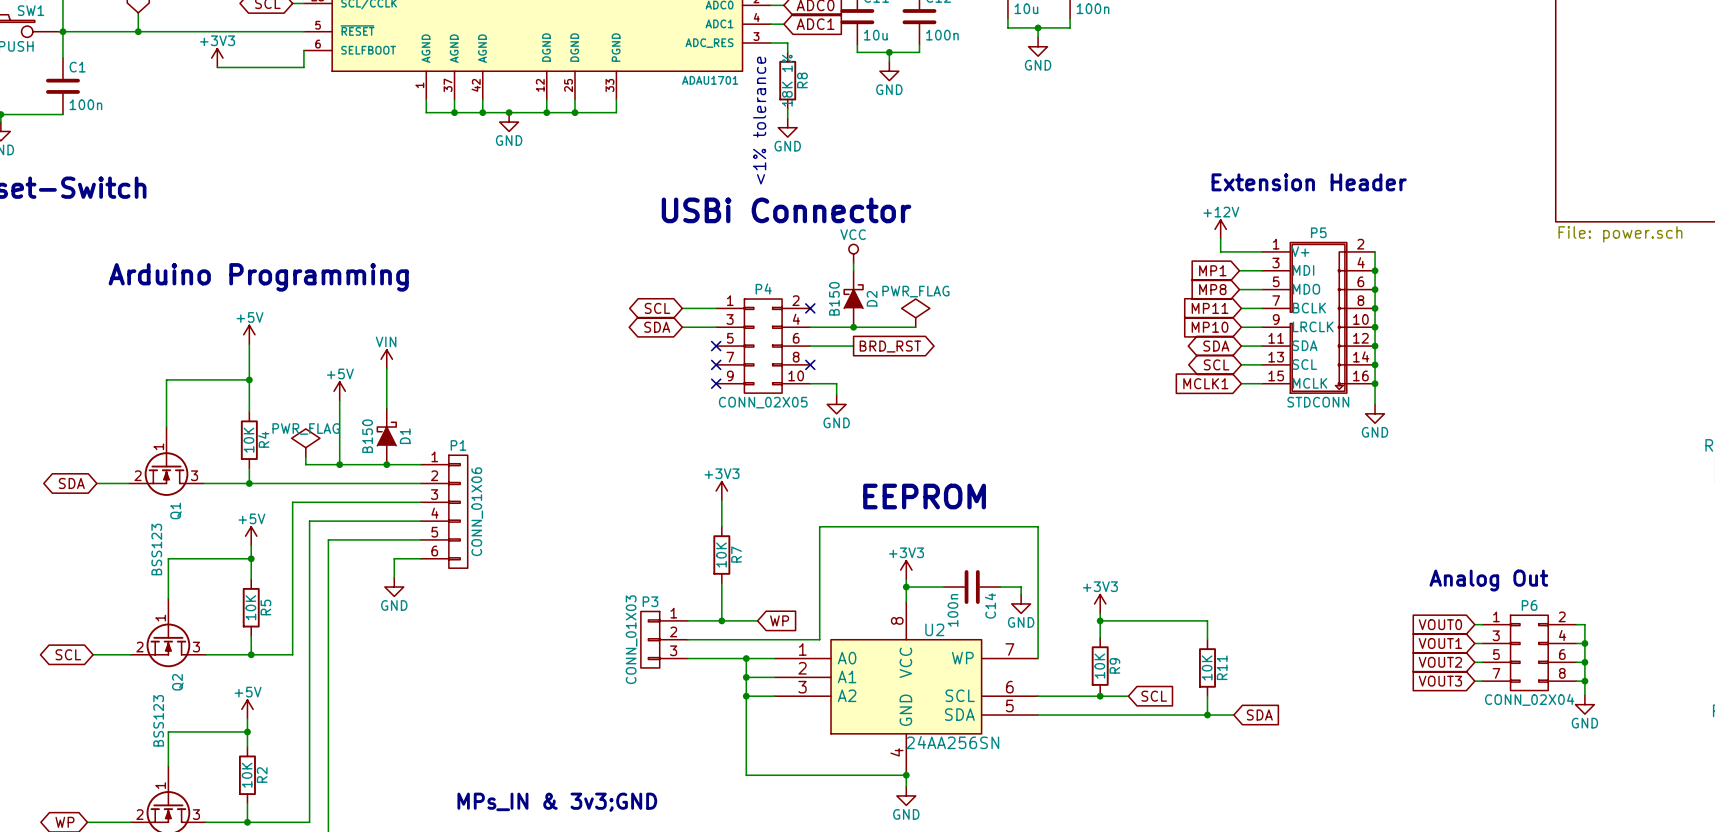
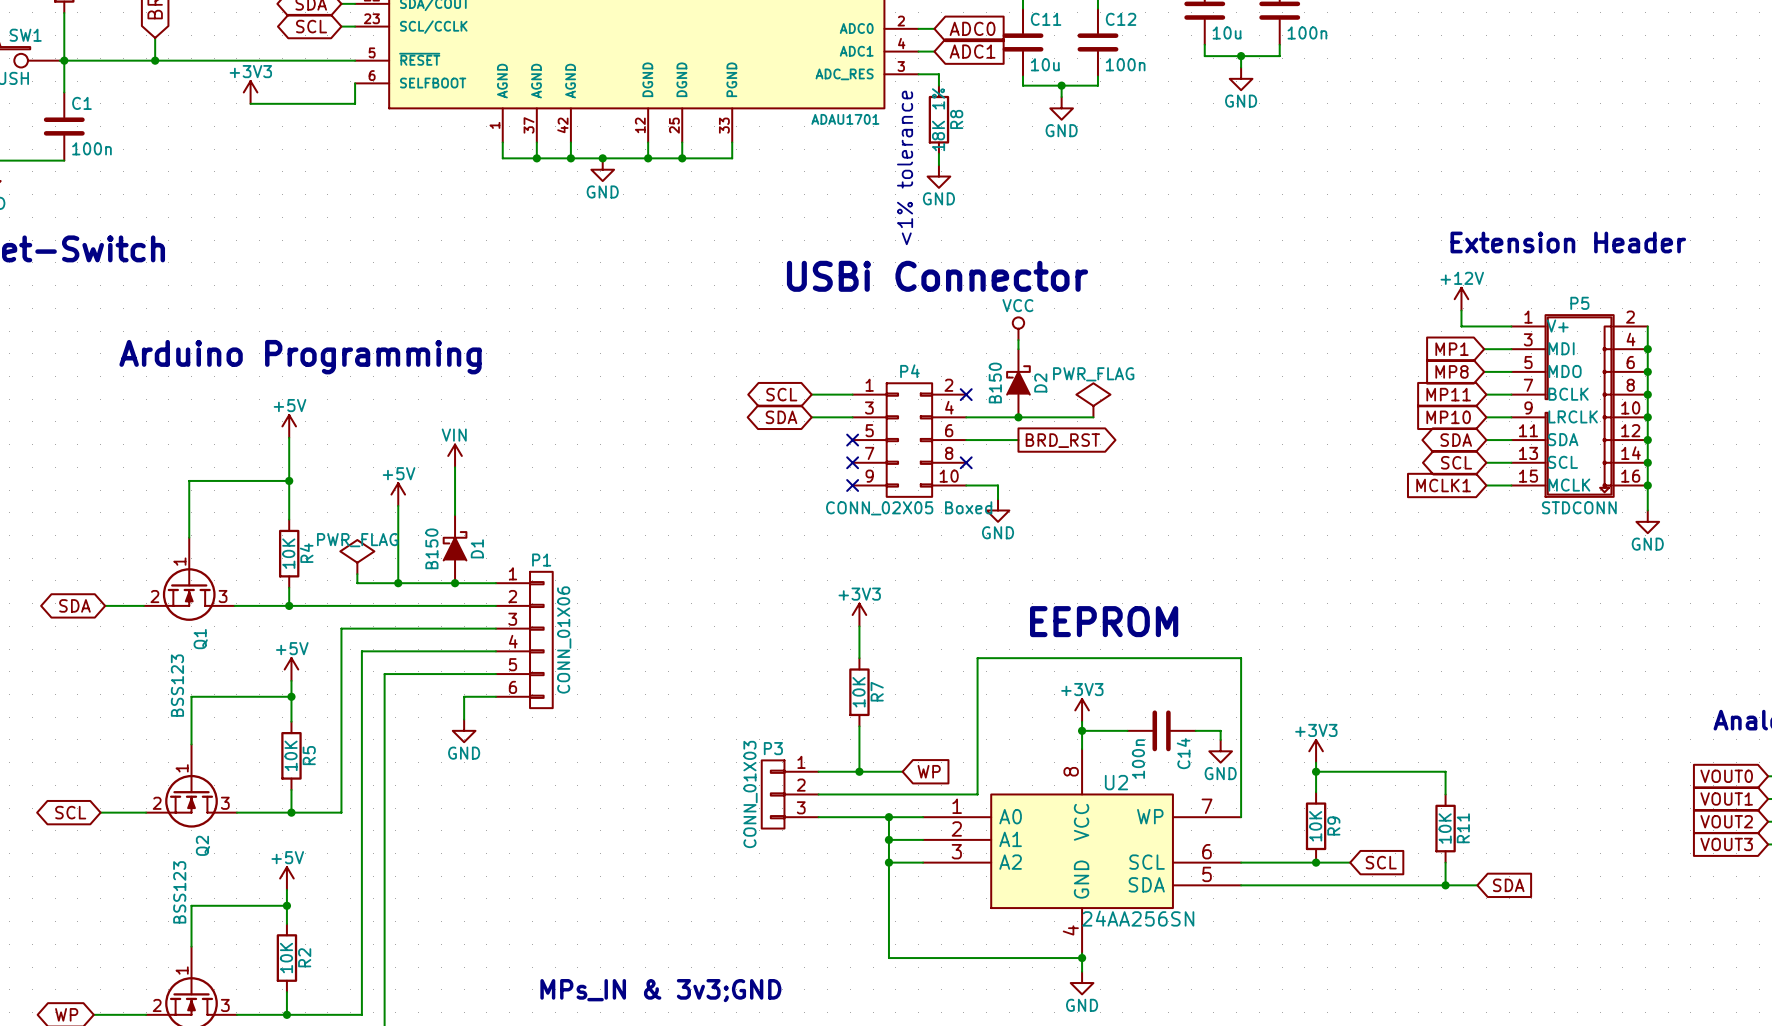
P4 value: CONN_02X05 (763, 402) -> CONN_02X05 Boxed (909, 508)

